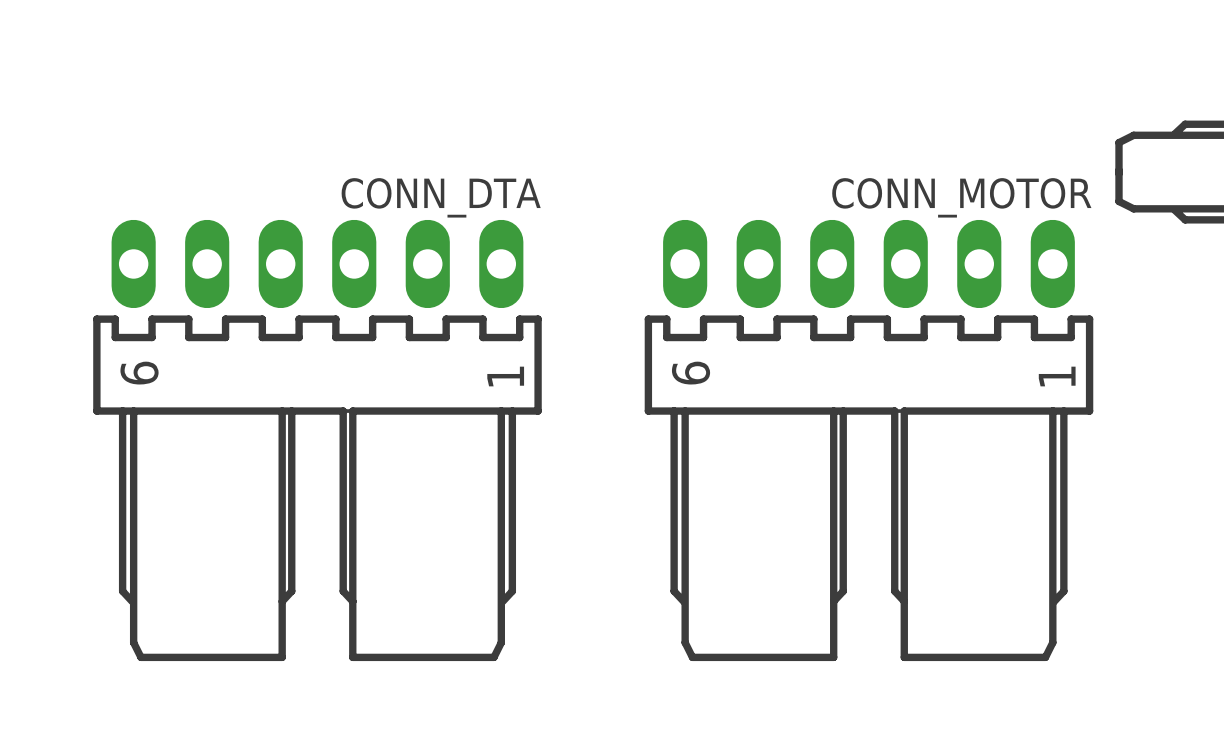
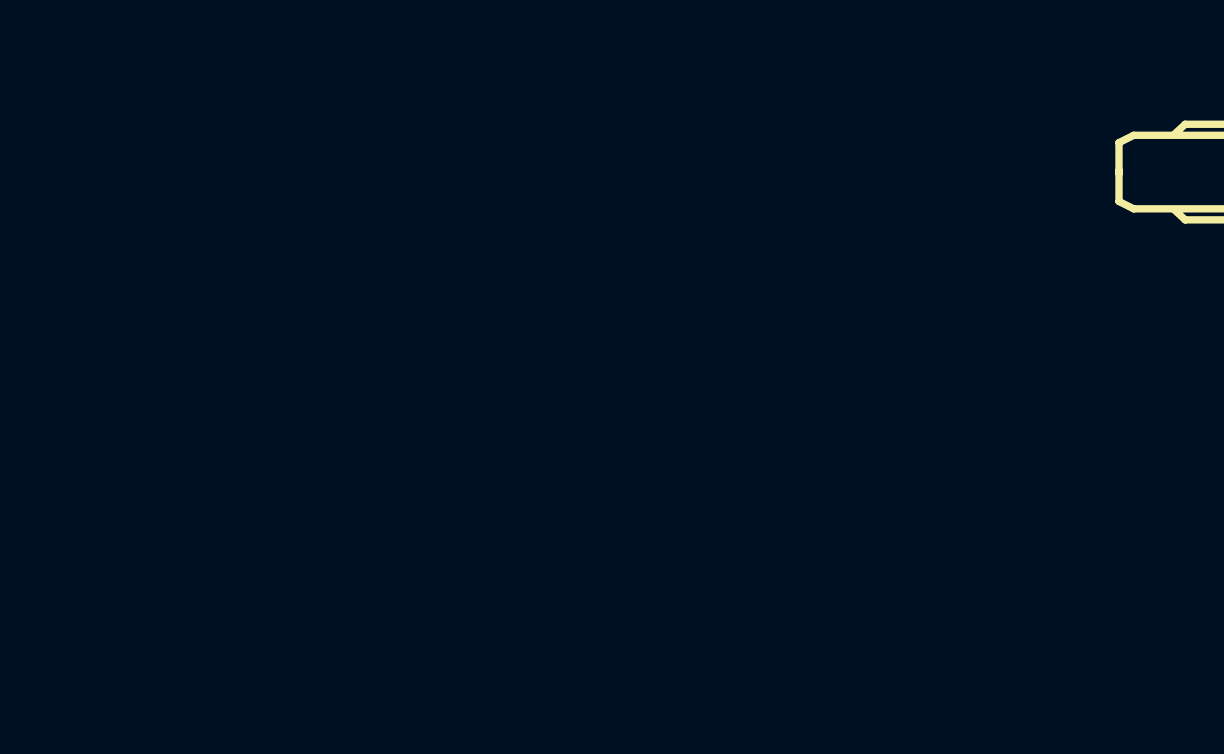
CONN_DTA: (317, 440) -> none
CONN_MOTOR: (868, 440) -> none

